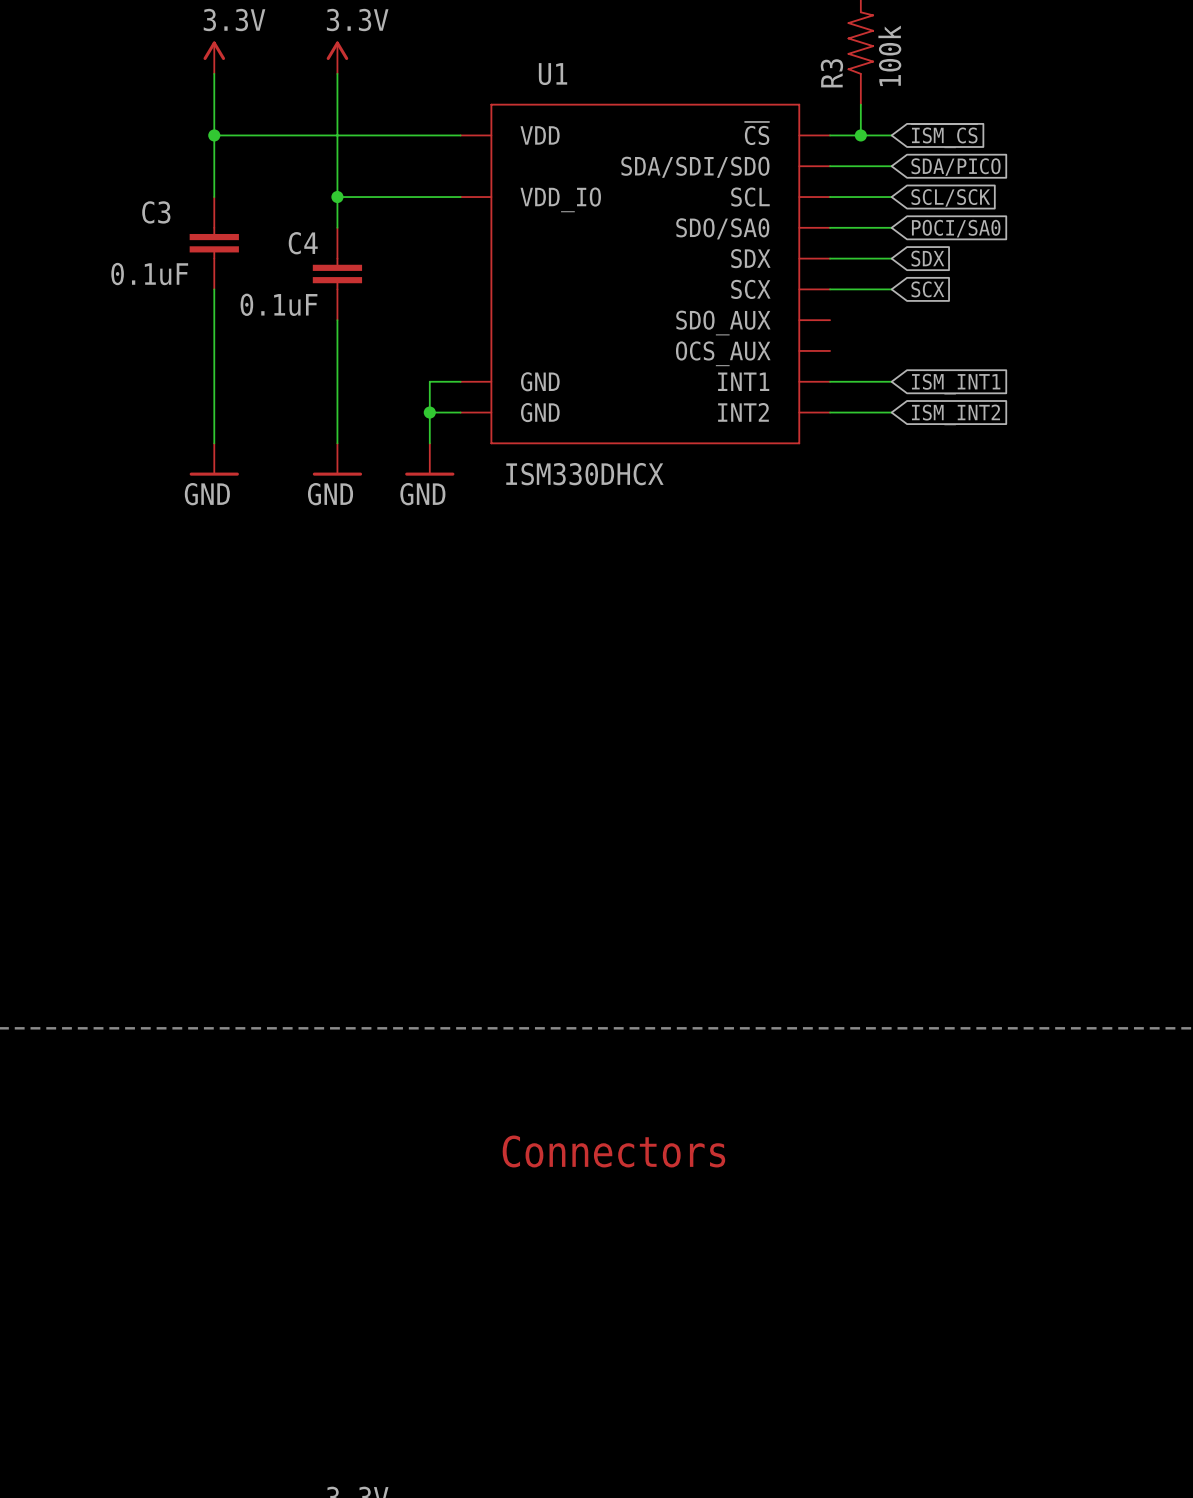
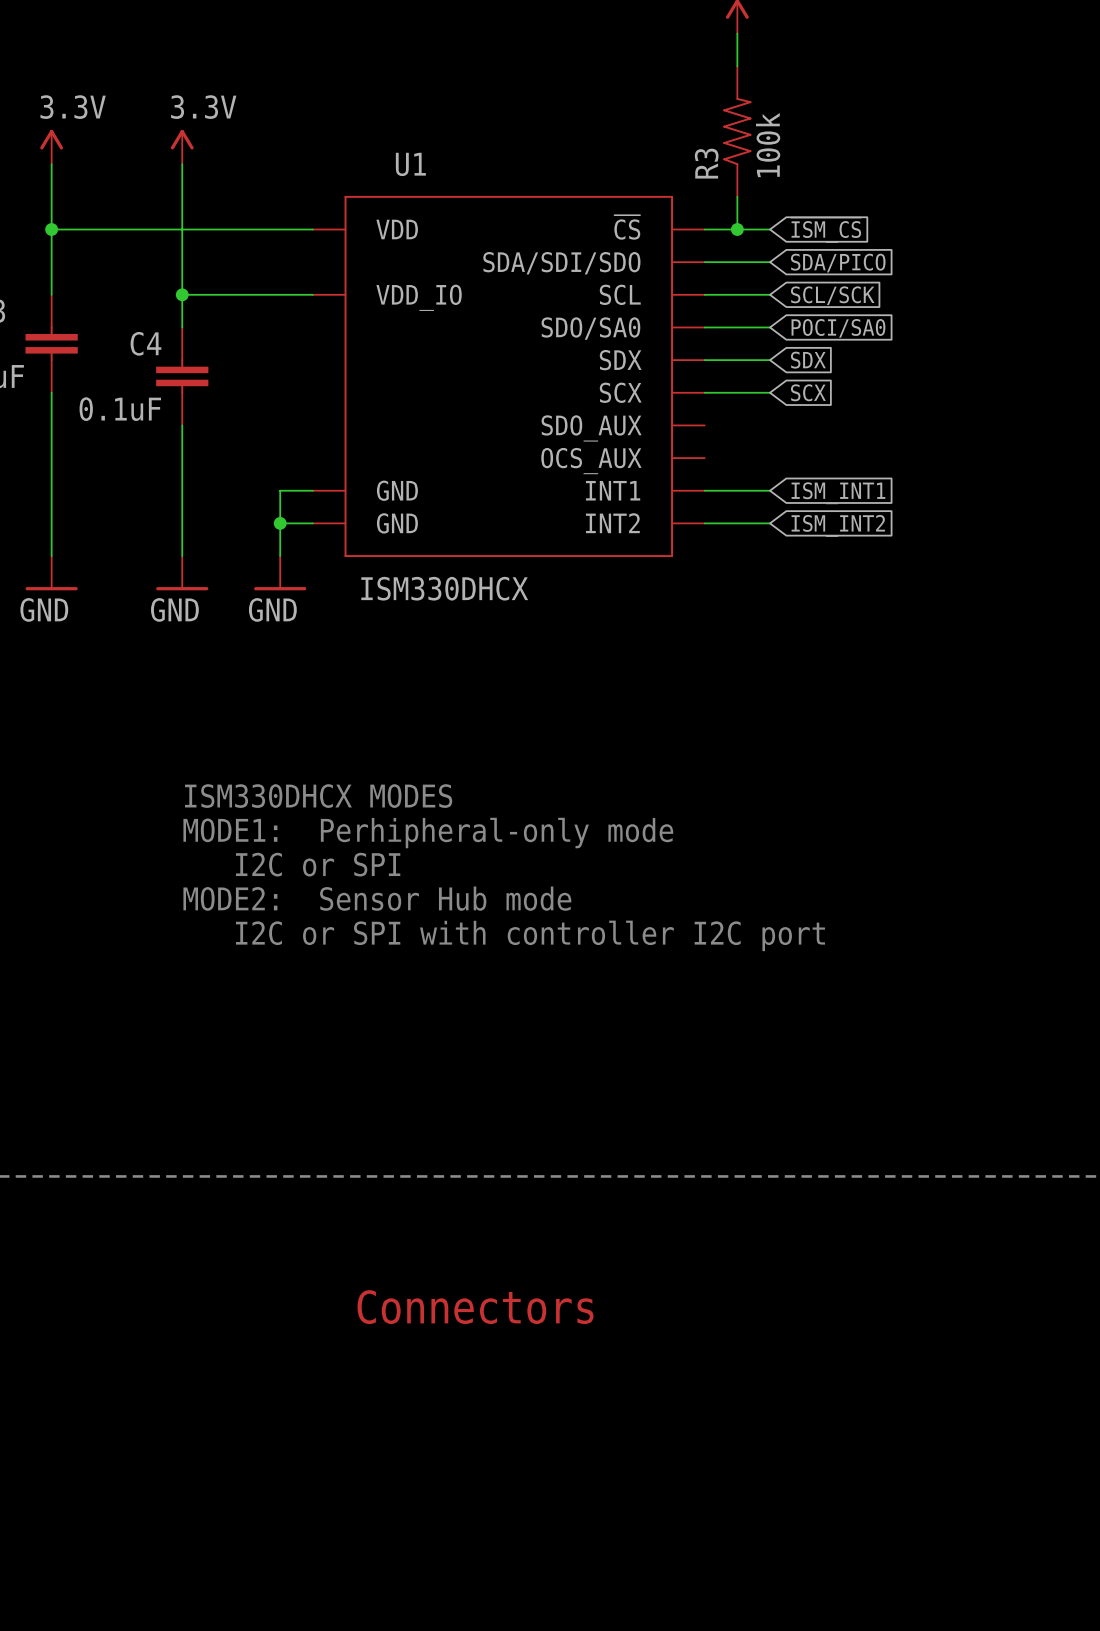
text: none -> ISM330DHCX MODES (318, 796)
text: none -> MODE1: Perhipheral-only mode (428, 833)
text: none -> I2C or SPI (318, 864)
text: none -> MODE2: Sensor Hub mode (377, 898)
text: none -> I2C or SPI with controller I2C port (530, 935)

